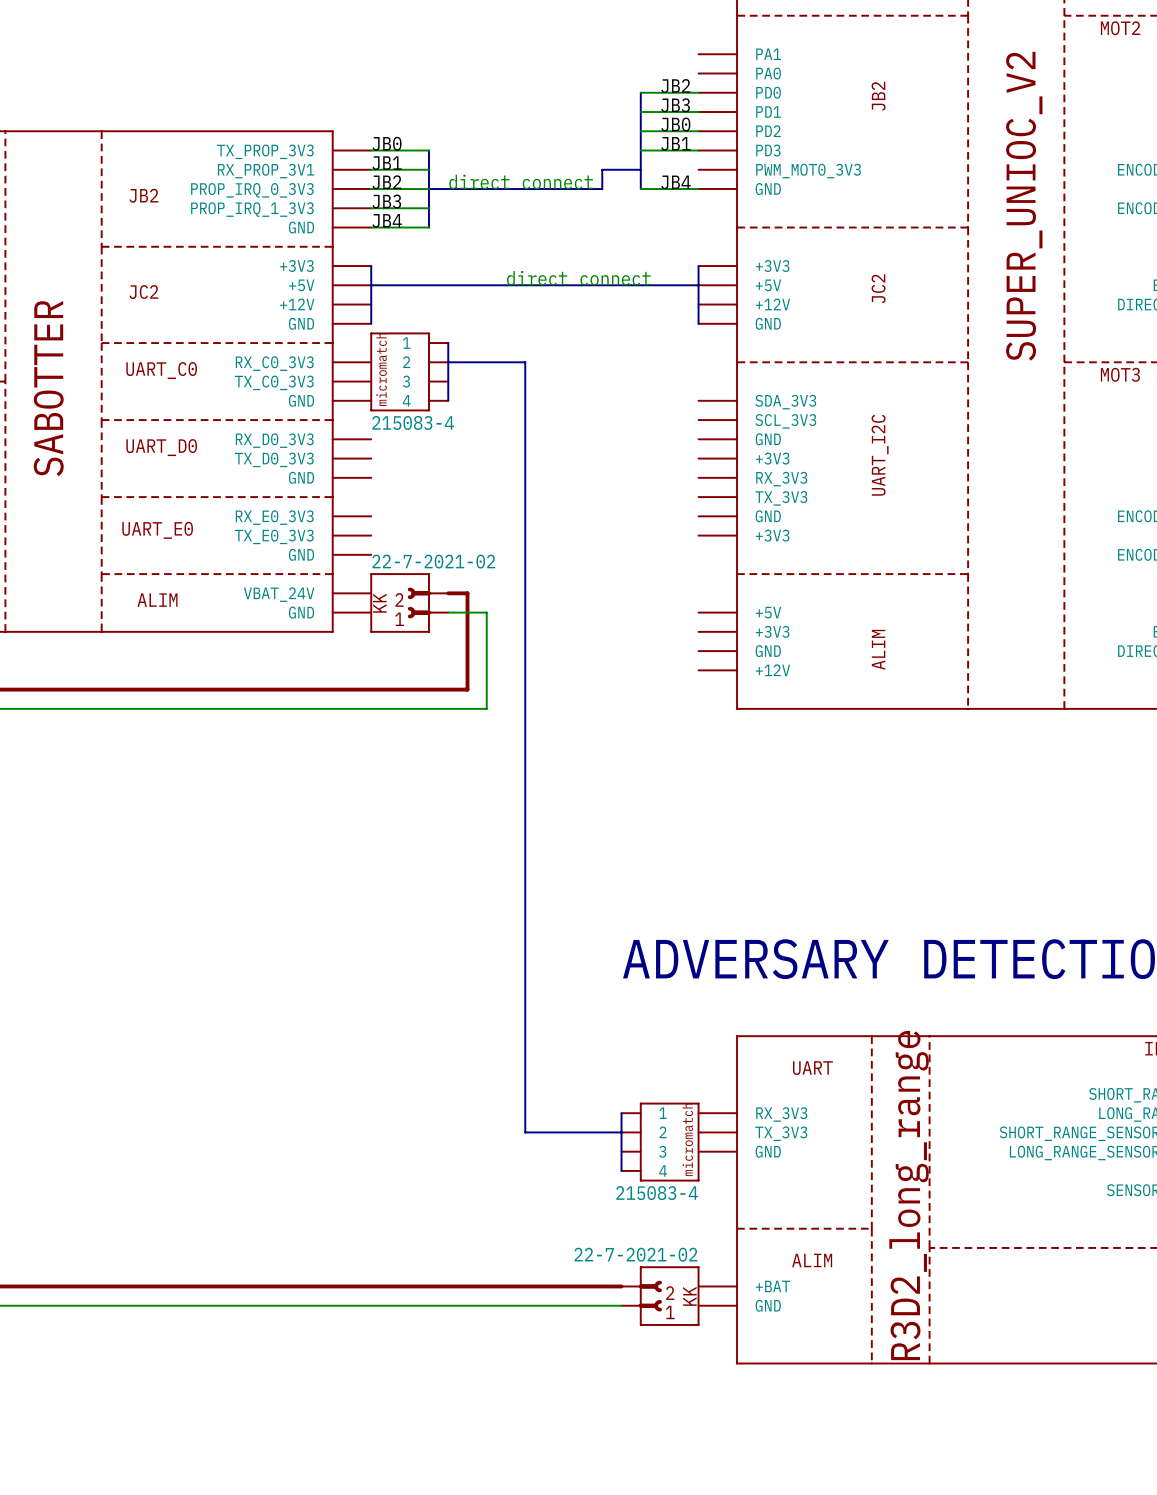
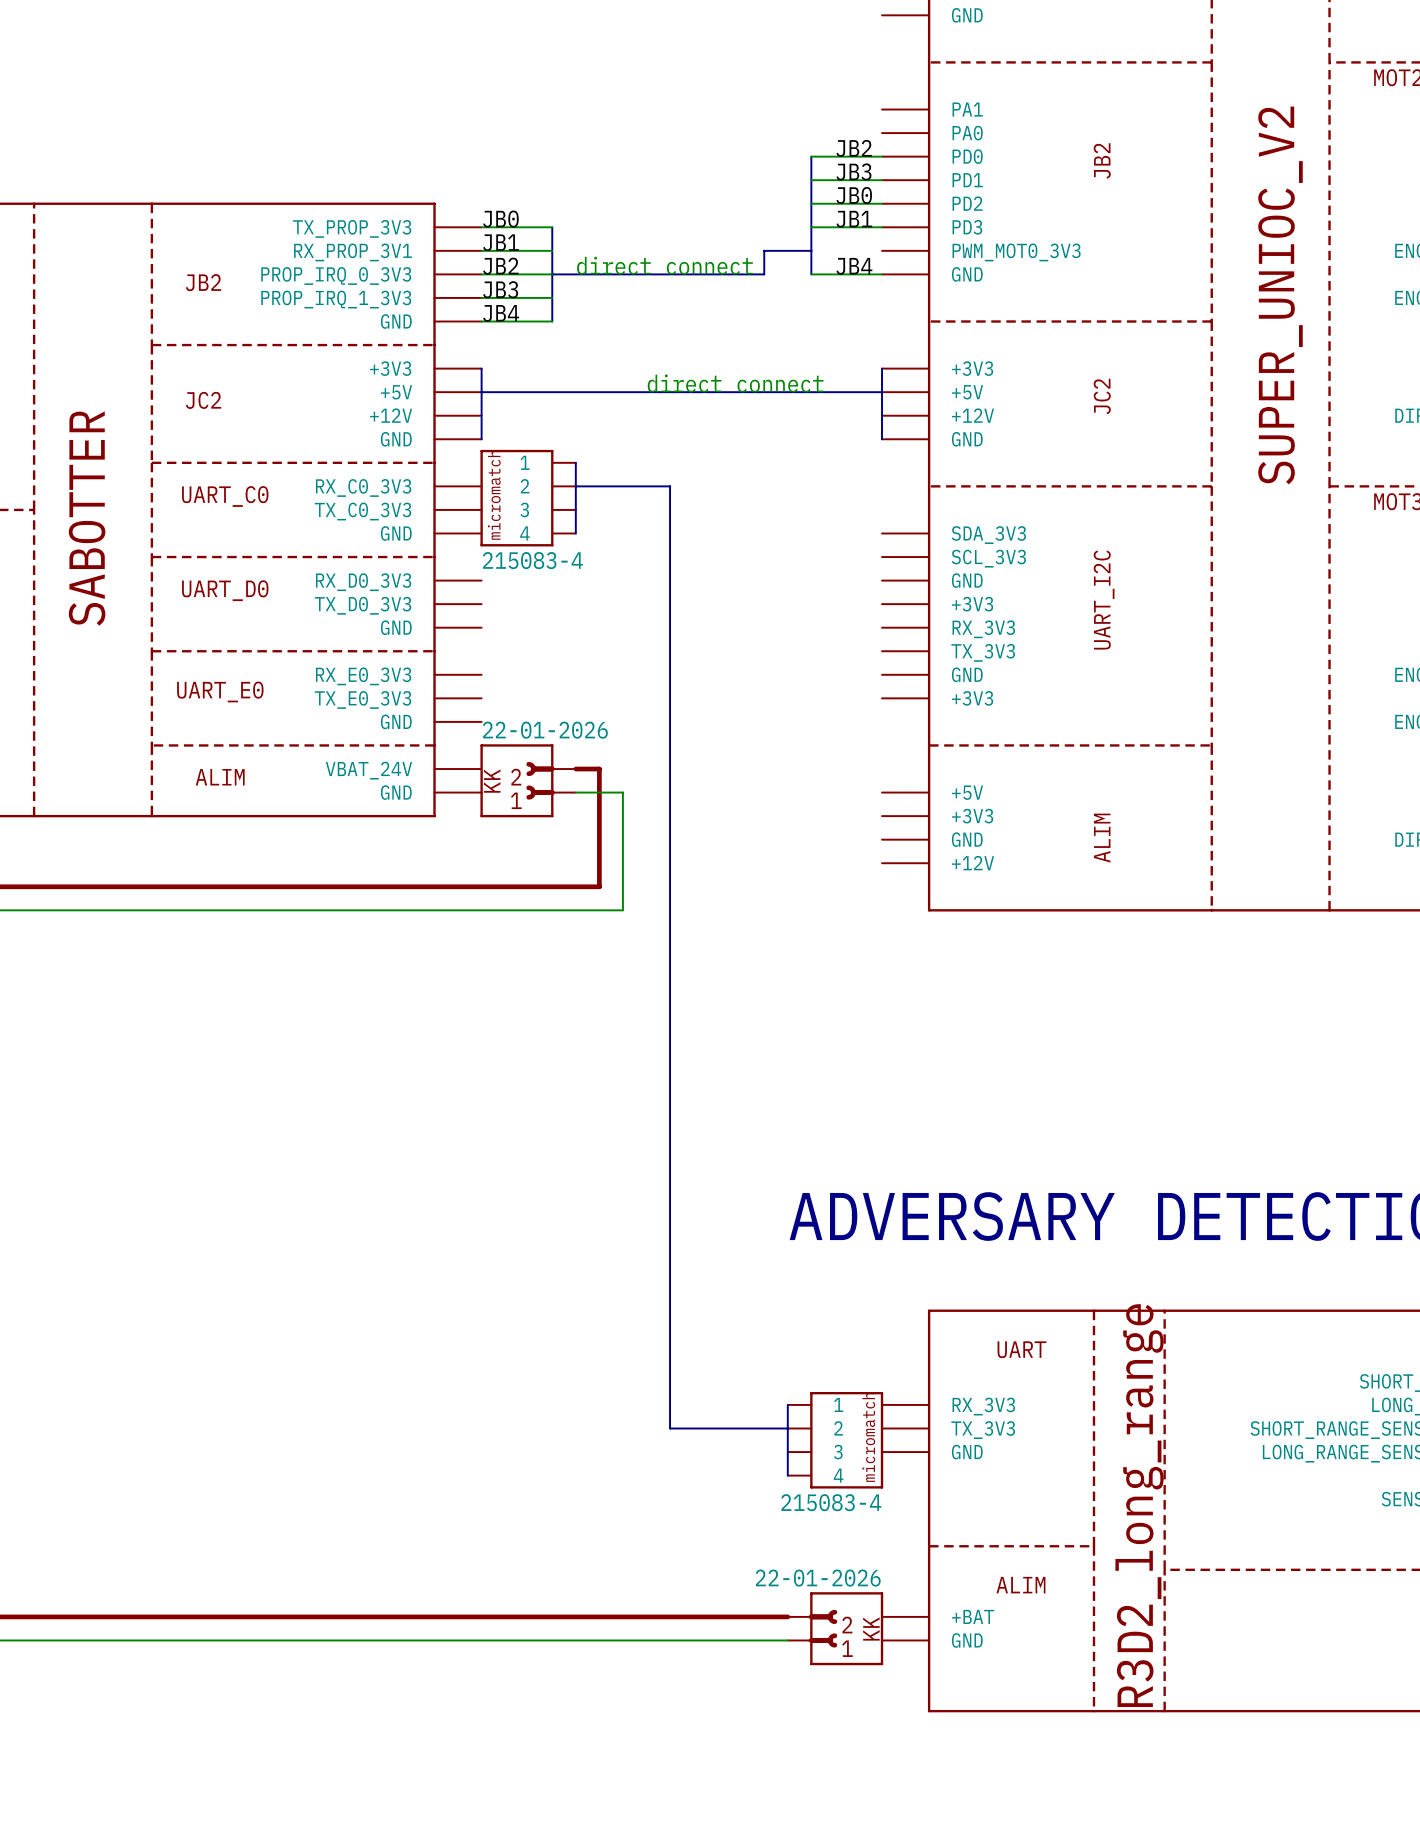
part value: 22-7-2021-02 (433, 561) -> 22-01-2026 (545, 730)
part value: 22-7-2021-02 (636, 1254) -> 22-01-2026 (818, 1578)

